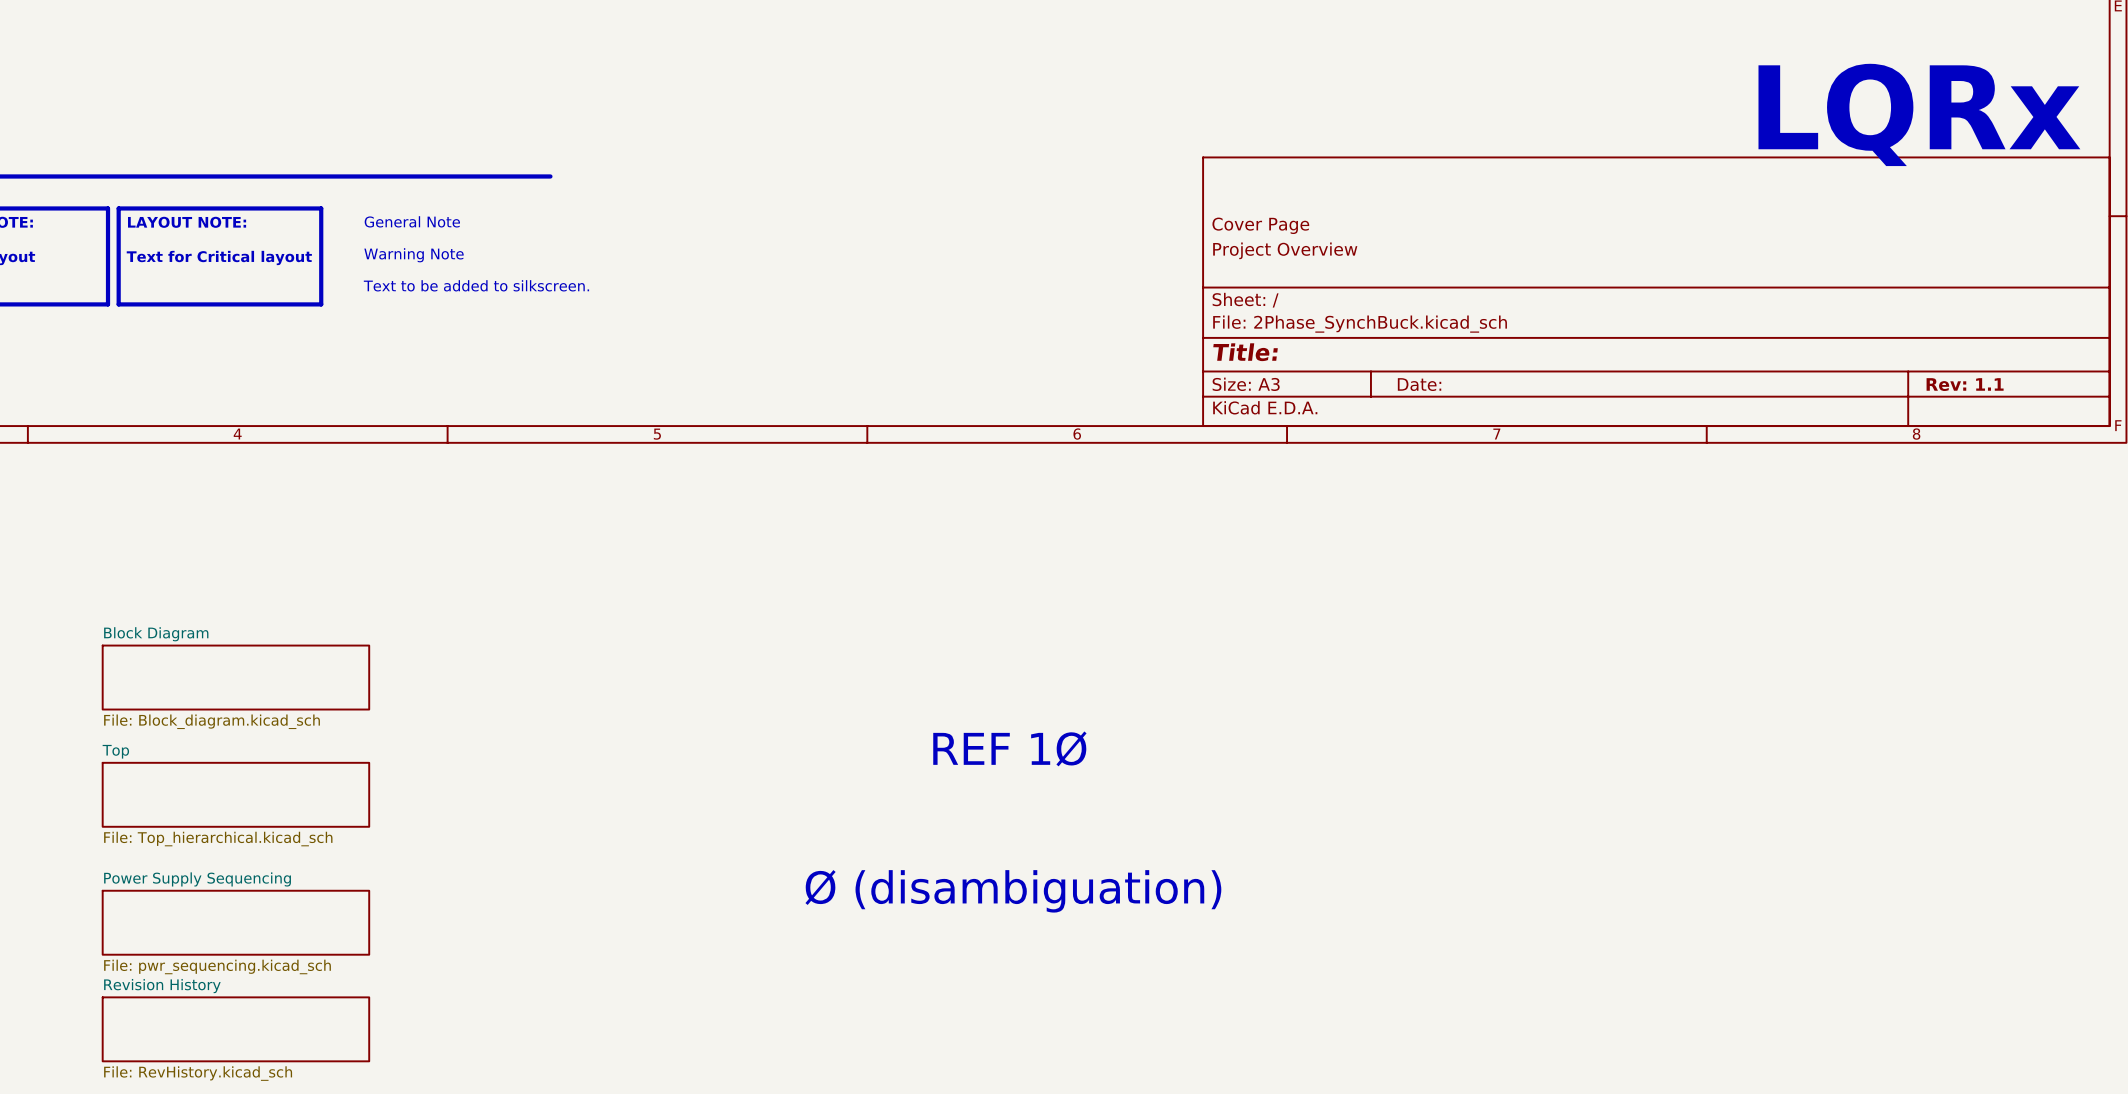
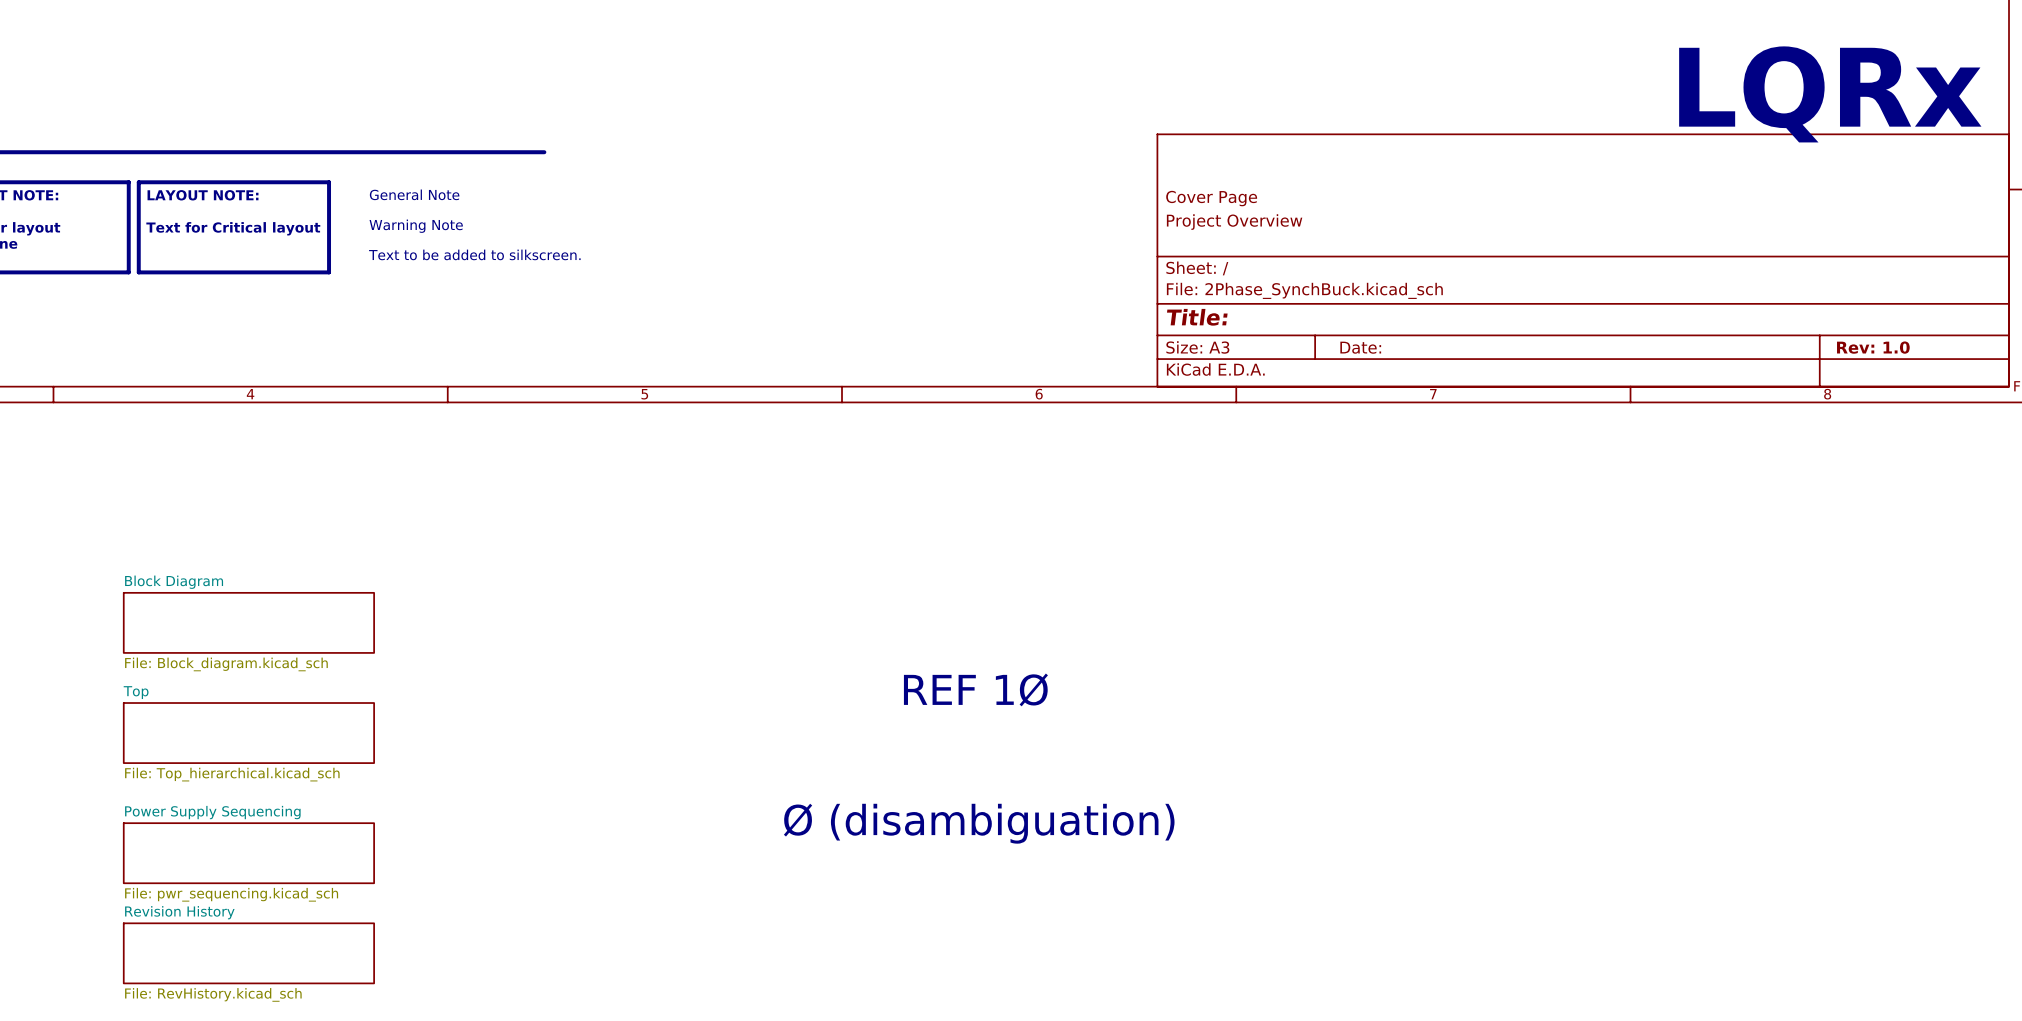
title block: Rev: 1.1 (1965, 384) -> Rev: 1.0 (1873, 347)

